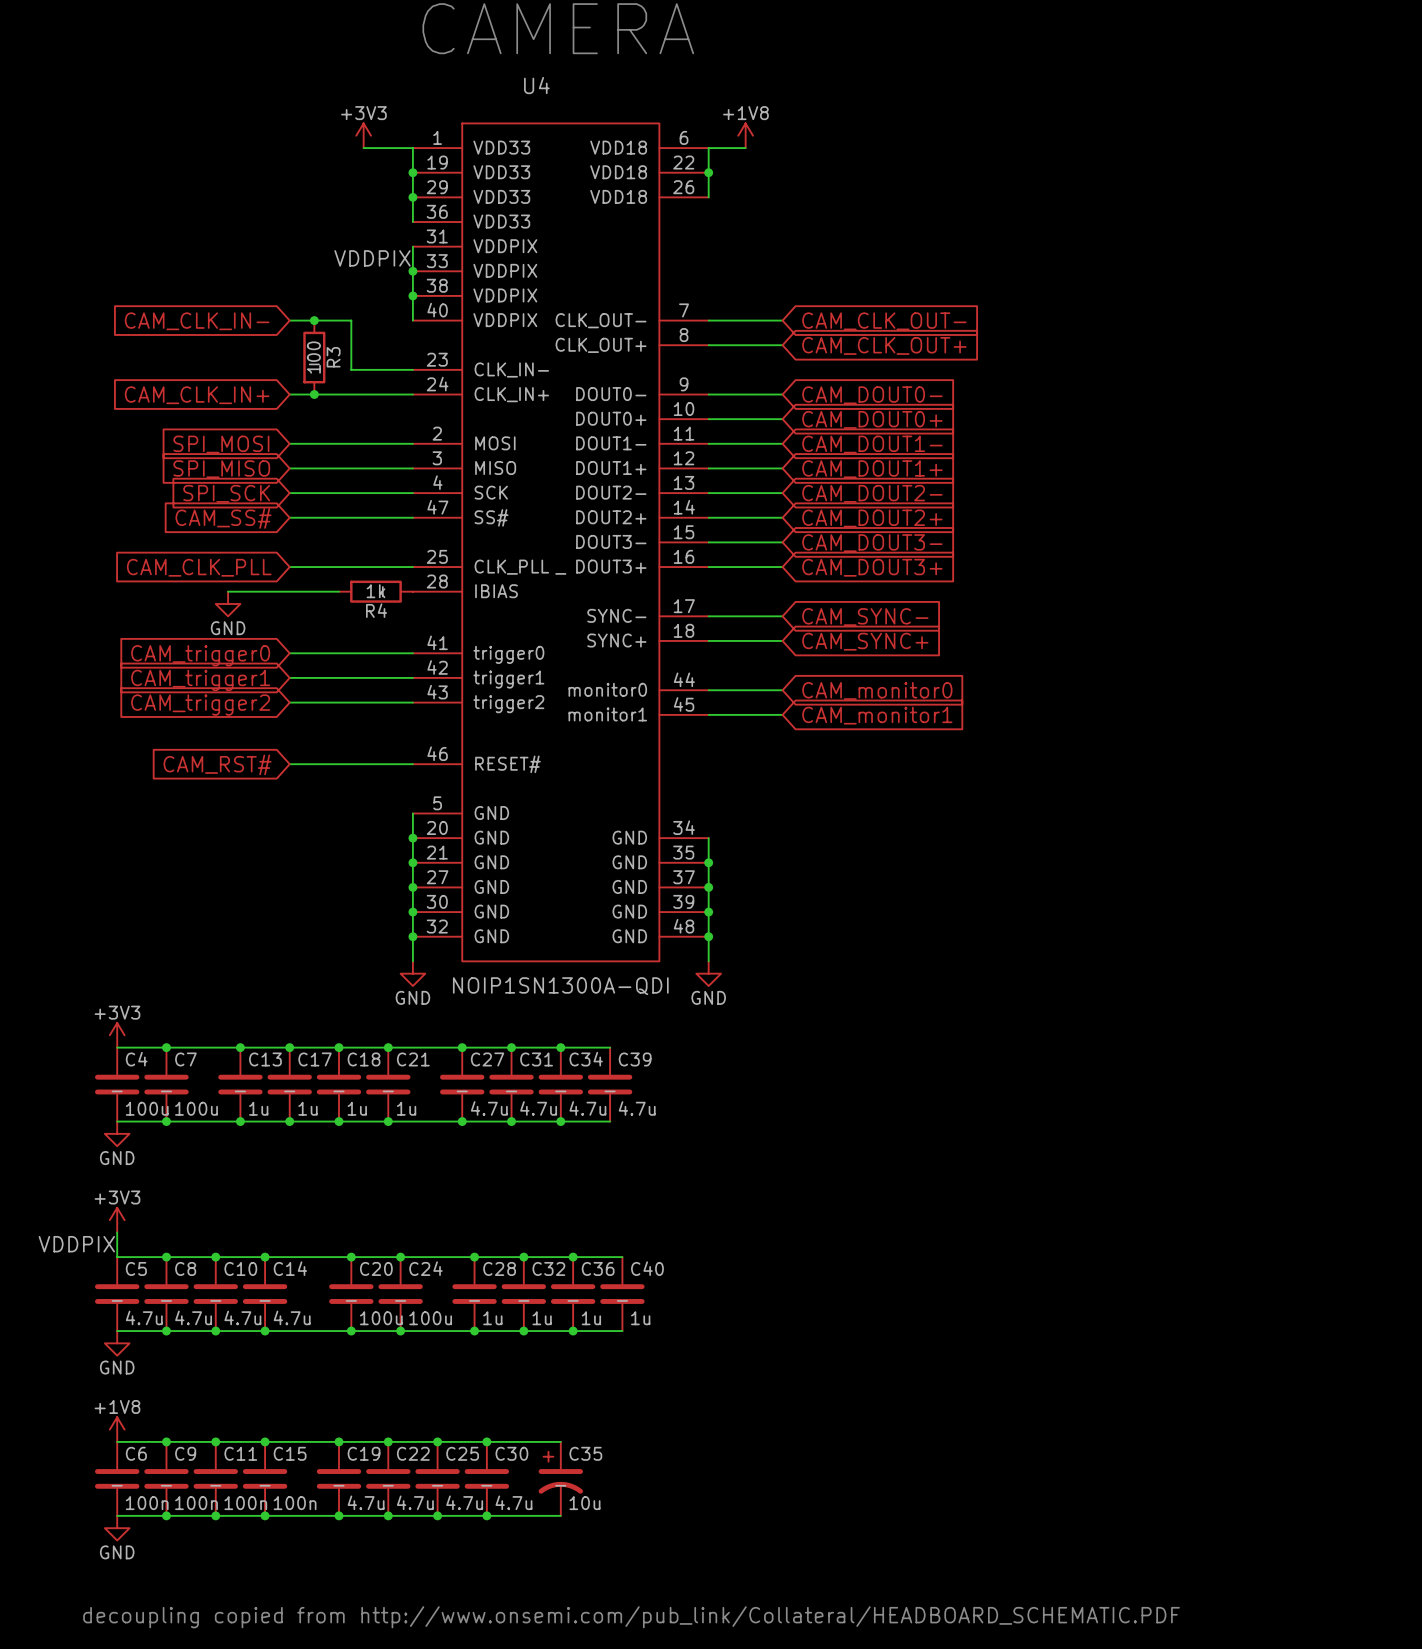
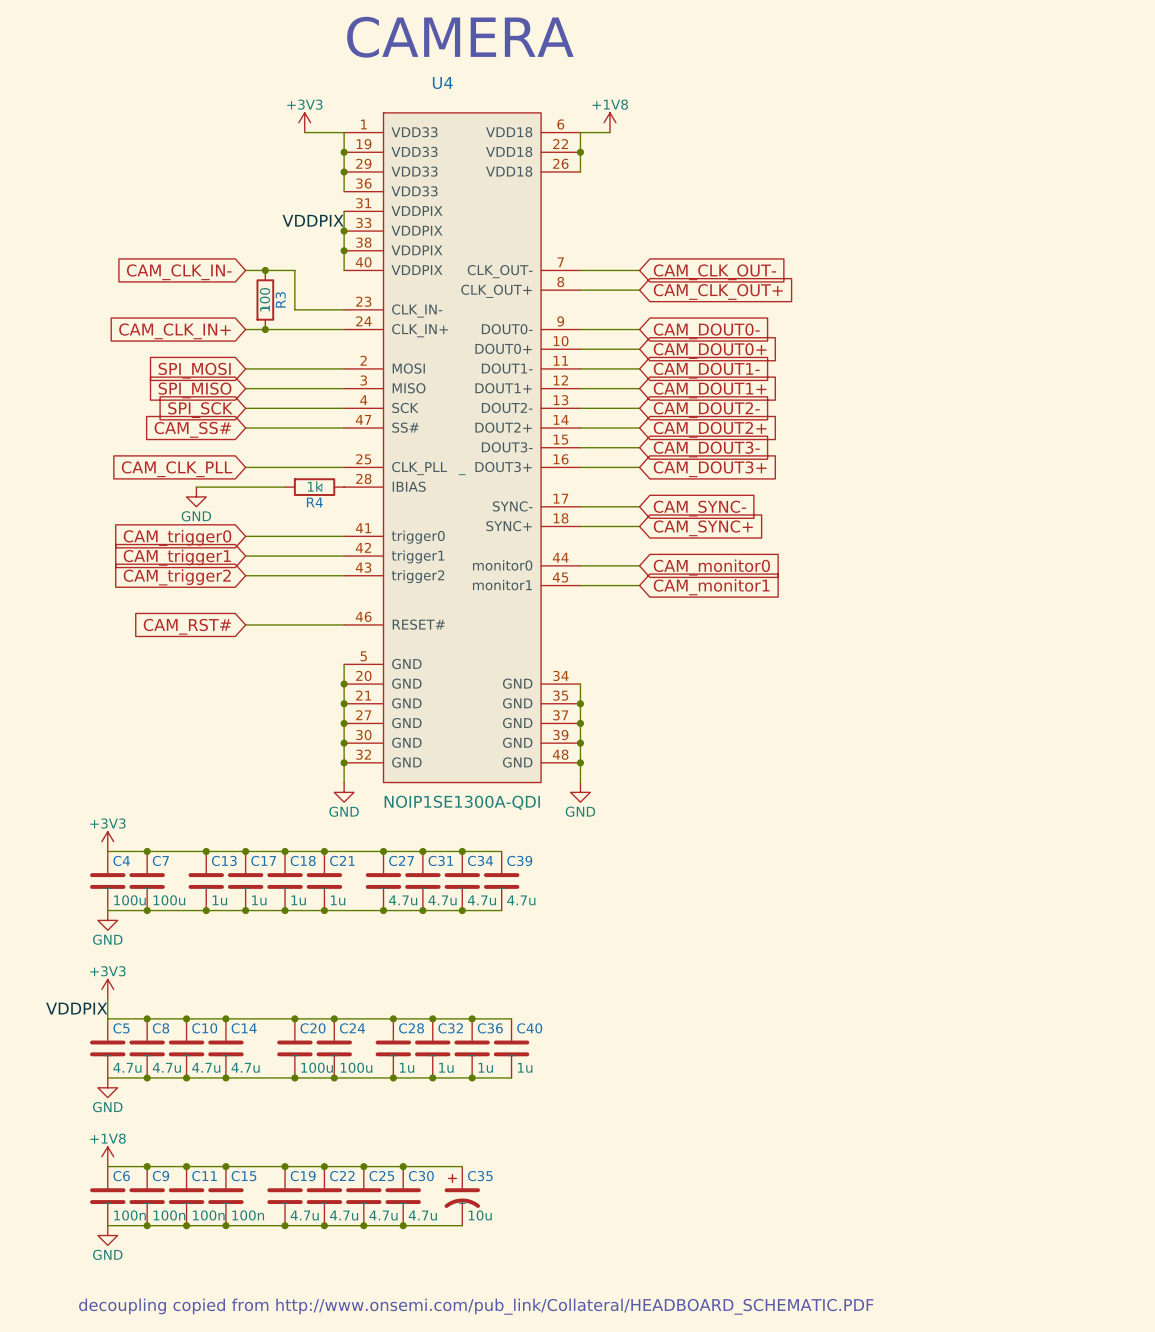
U4 value: NOIP1SN1300A-QDI (560, 986) -> NOIP1SE1300A-QDI (462, 802)

